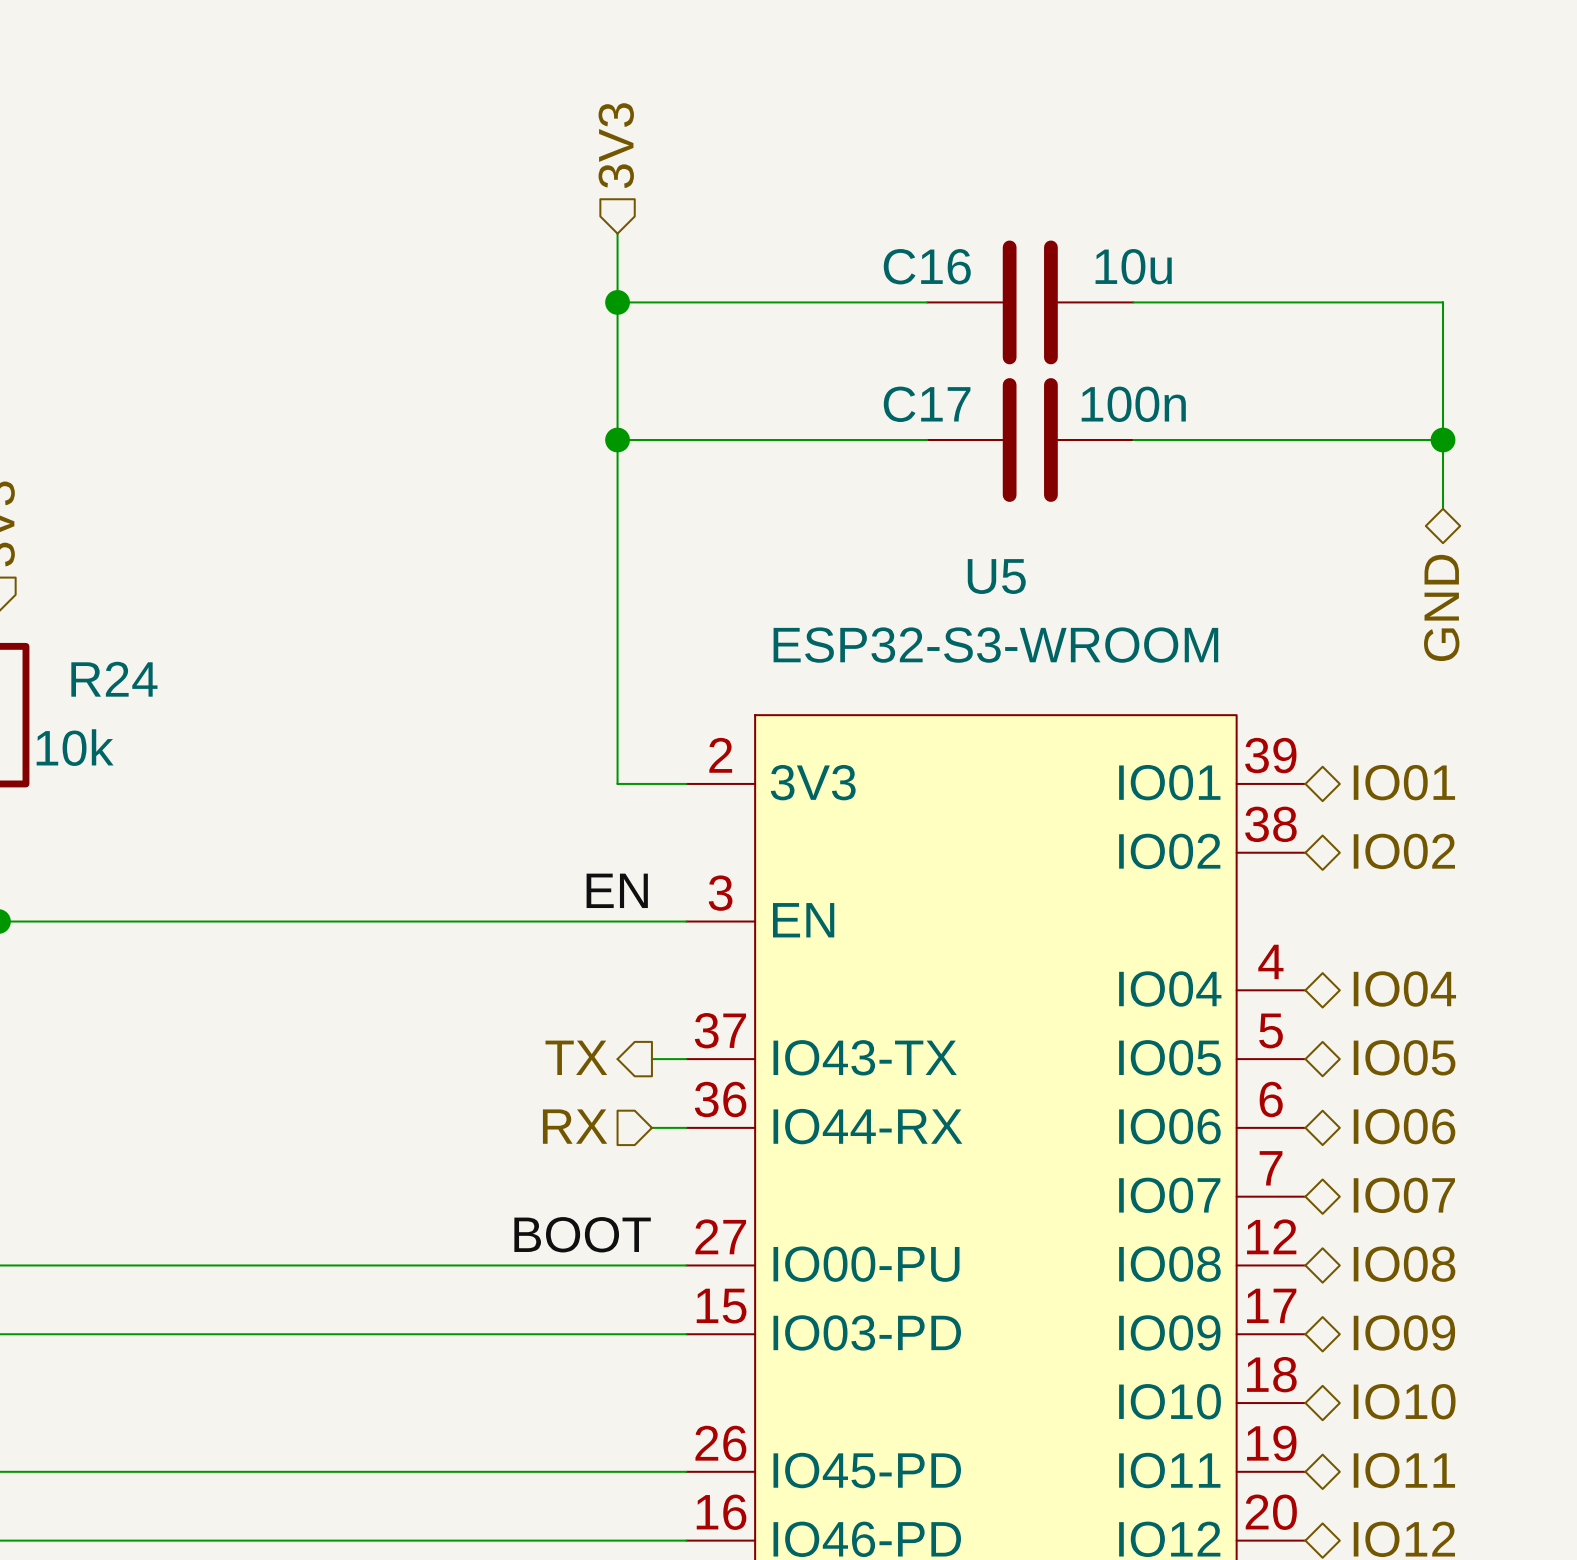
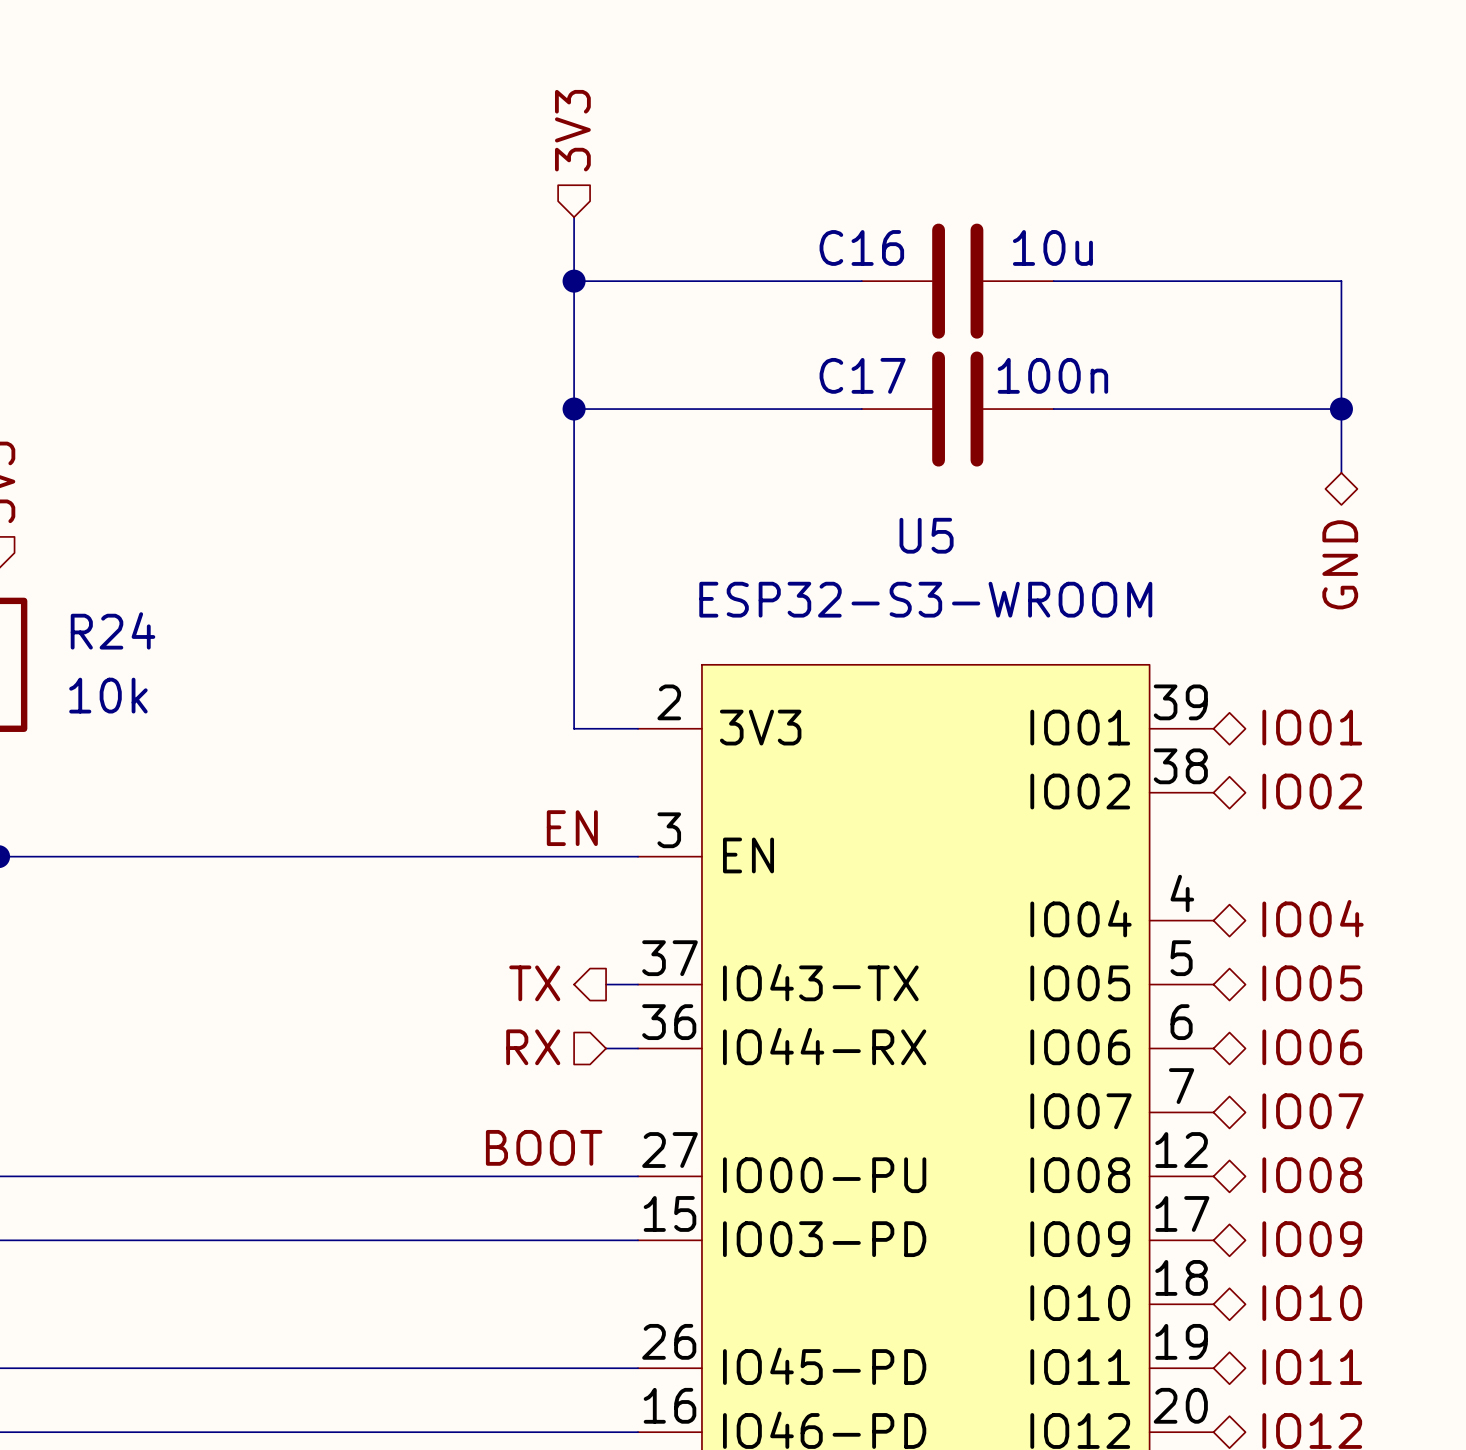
R24 value position: 10k (75, 747) -> 10k (108, 695)

